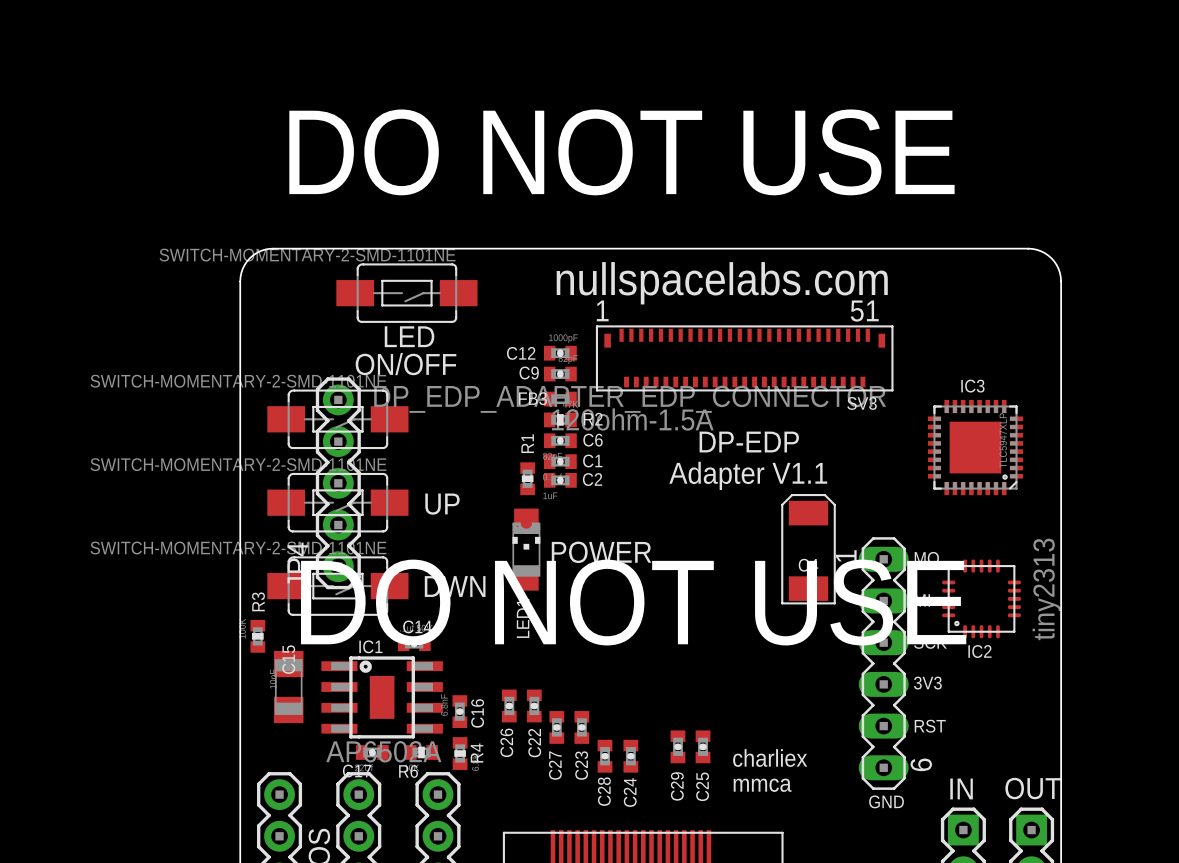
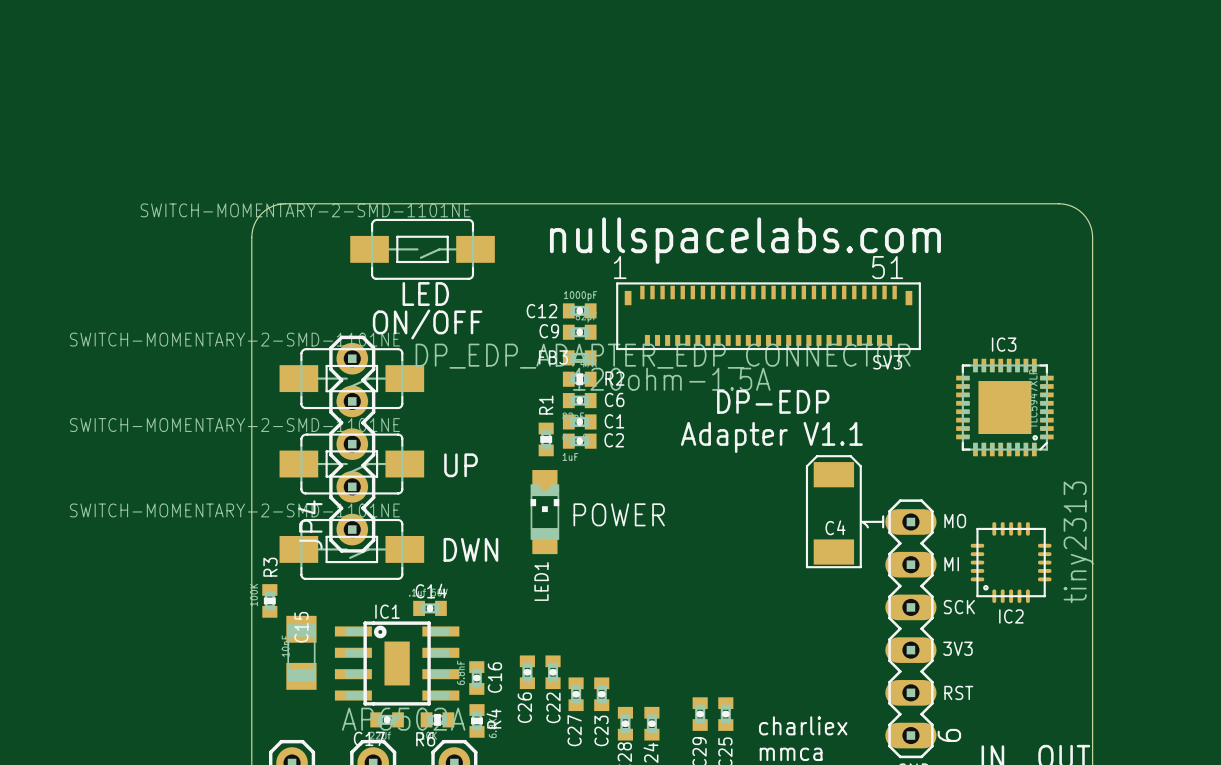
text: DO NOT USE (621, 152) -> none
text: DO NOT USE (633, 602) -> none

